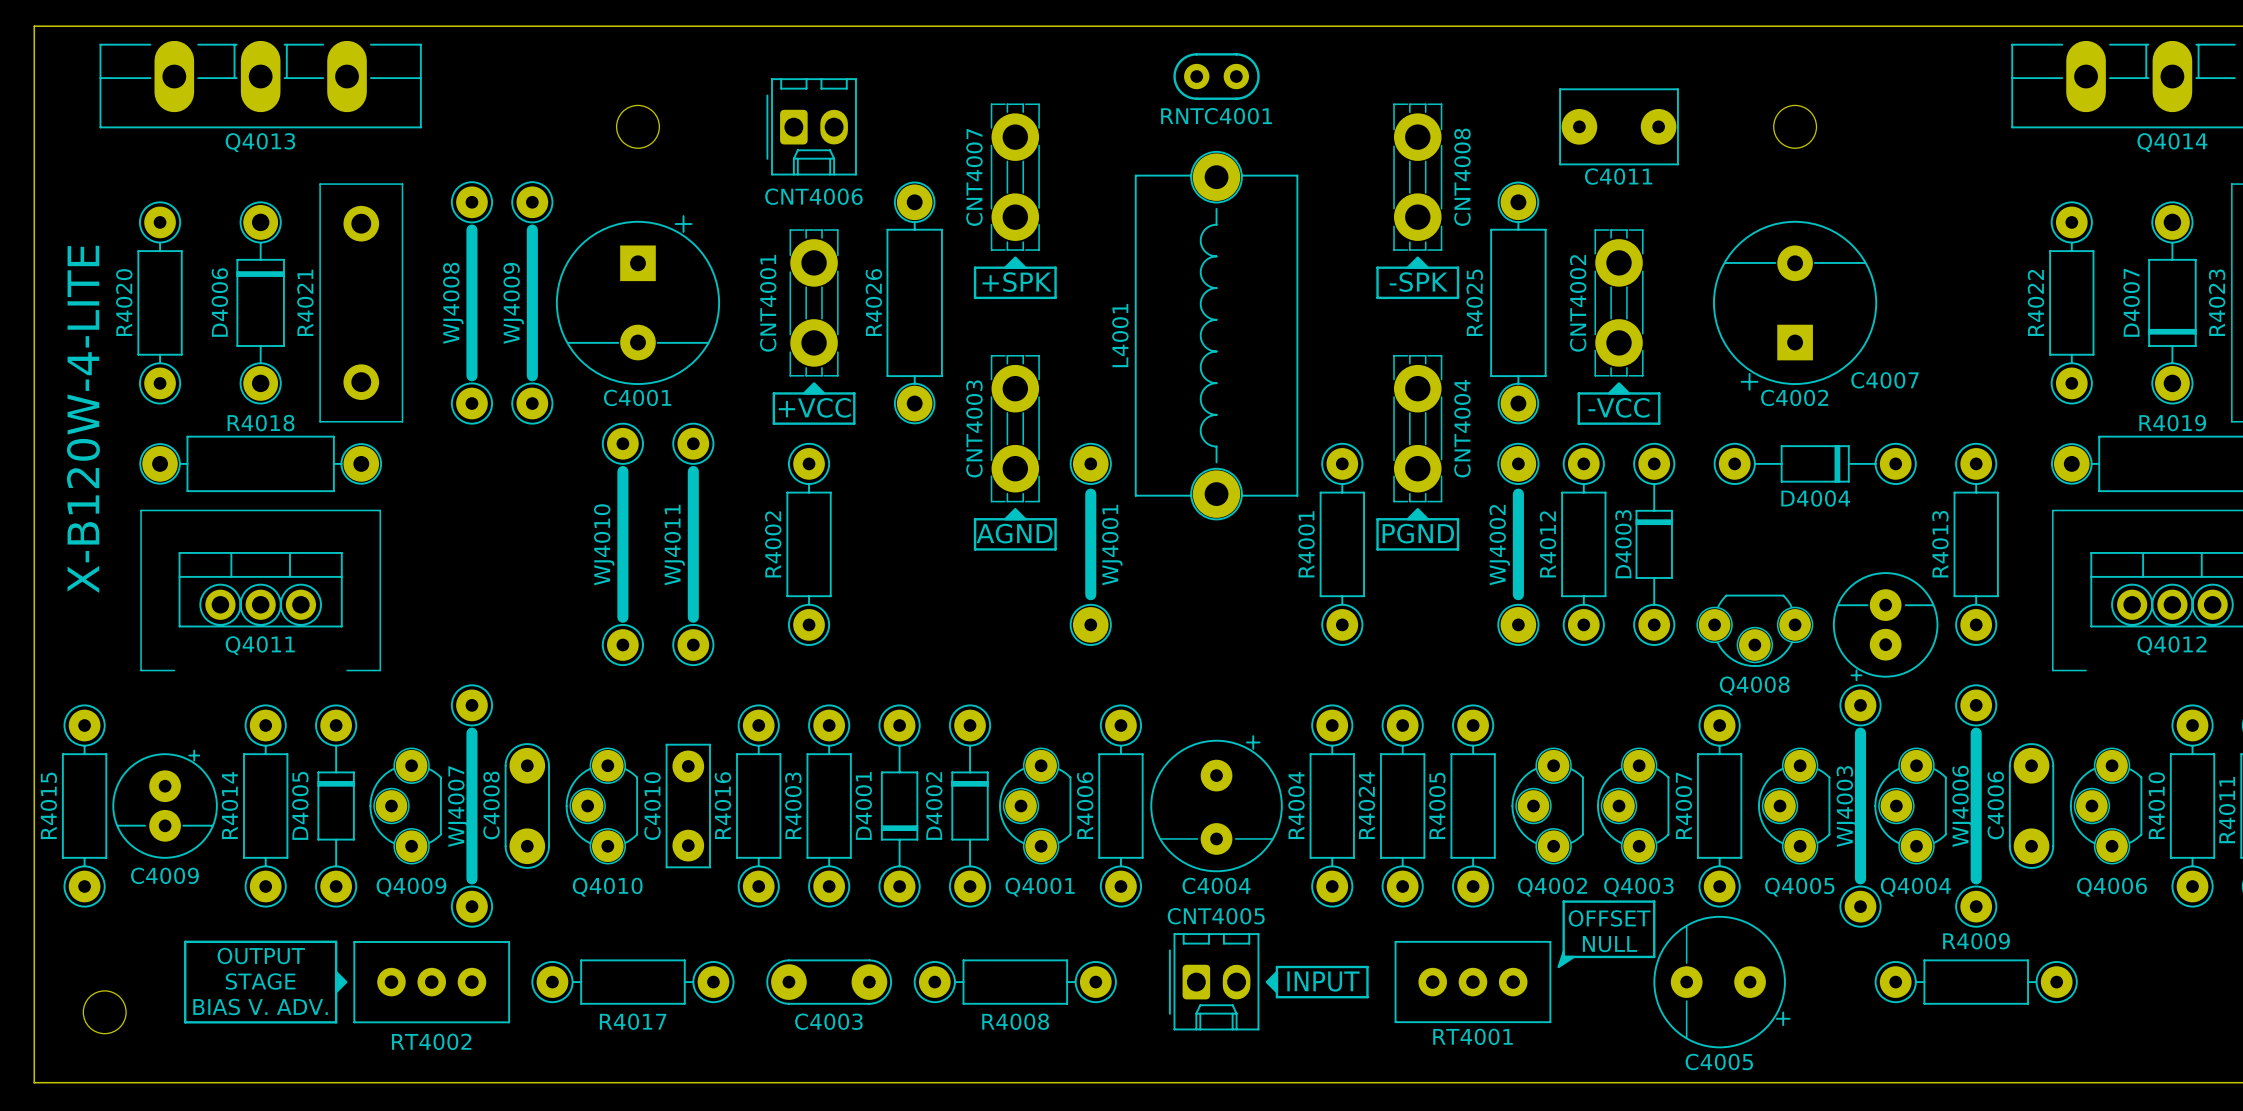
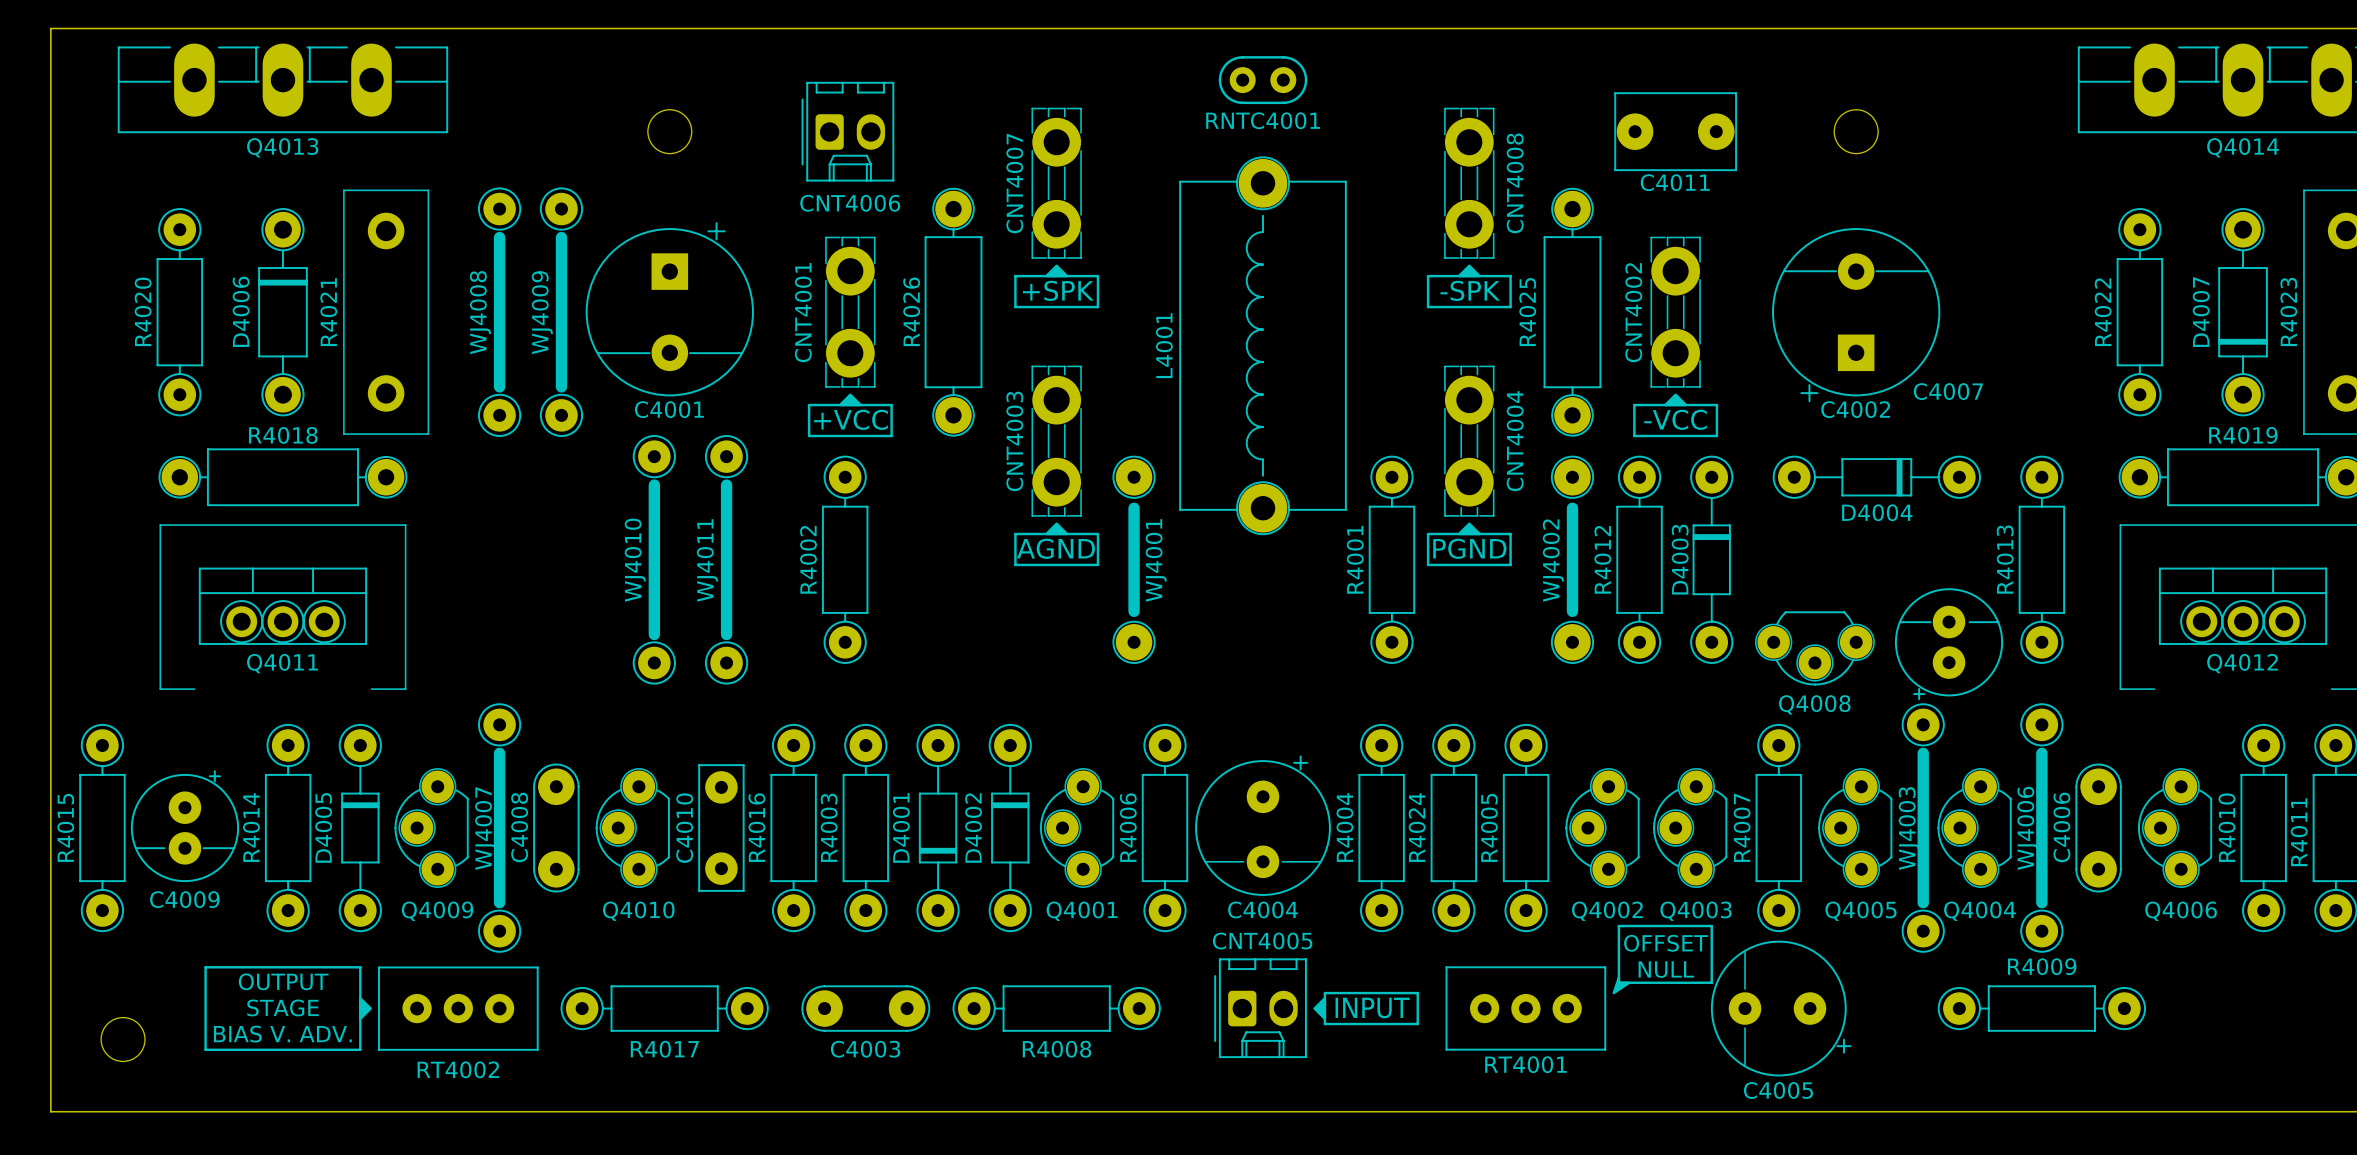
text: X-B120W-4-LITE (83, 419) -> none

